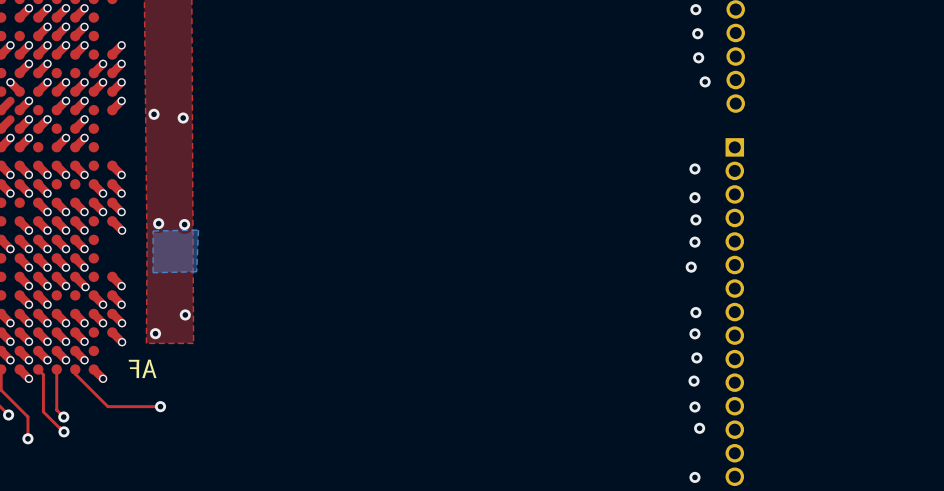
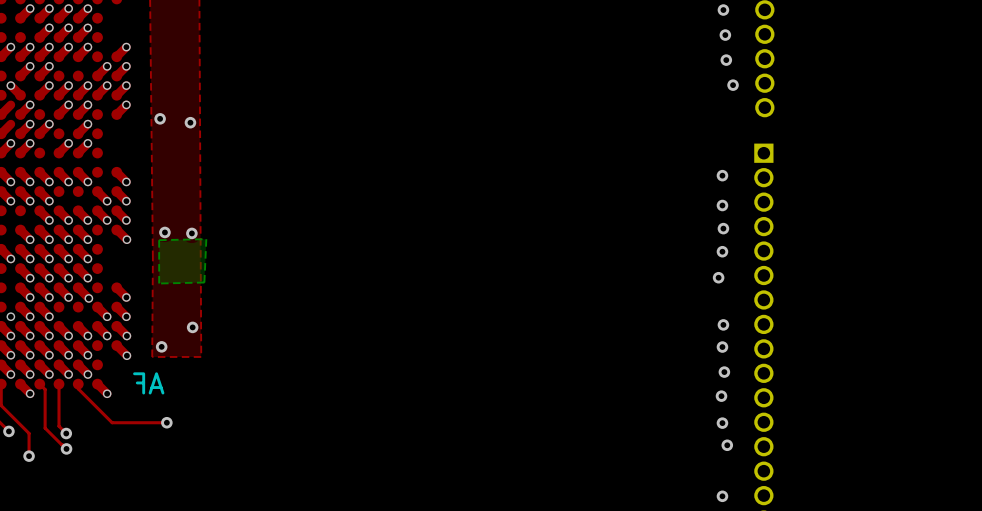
via: none -> (10, 316)

